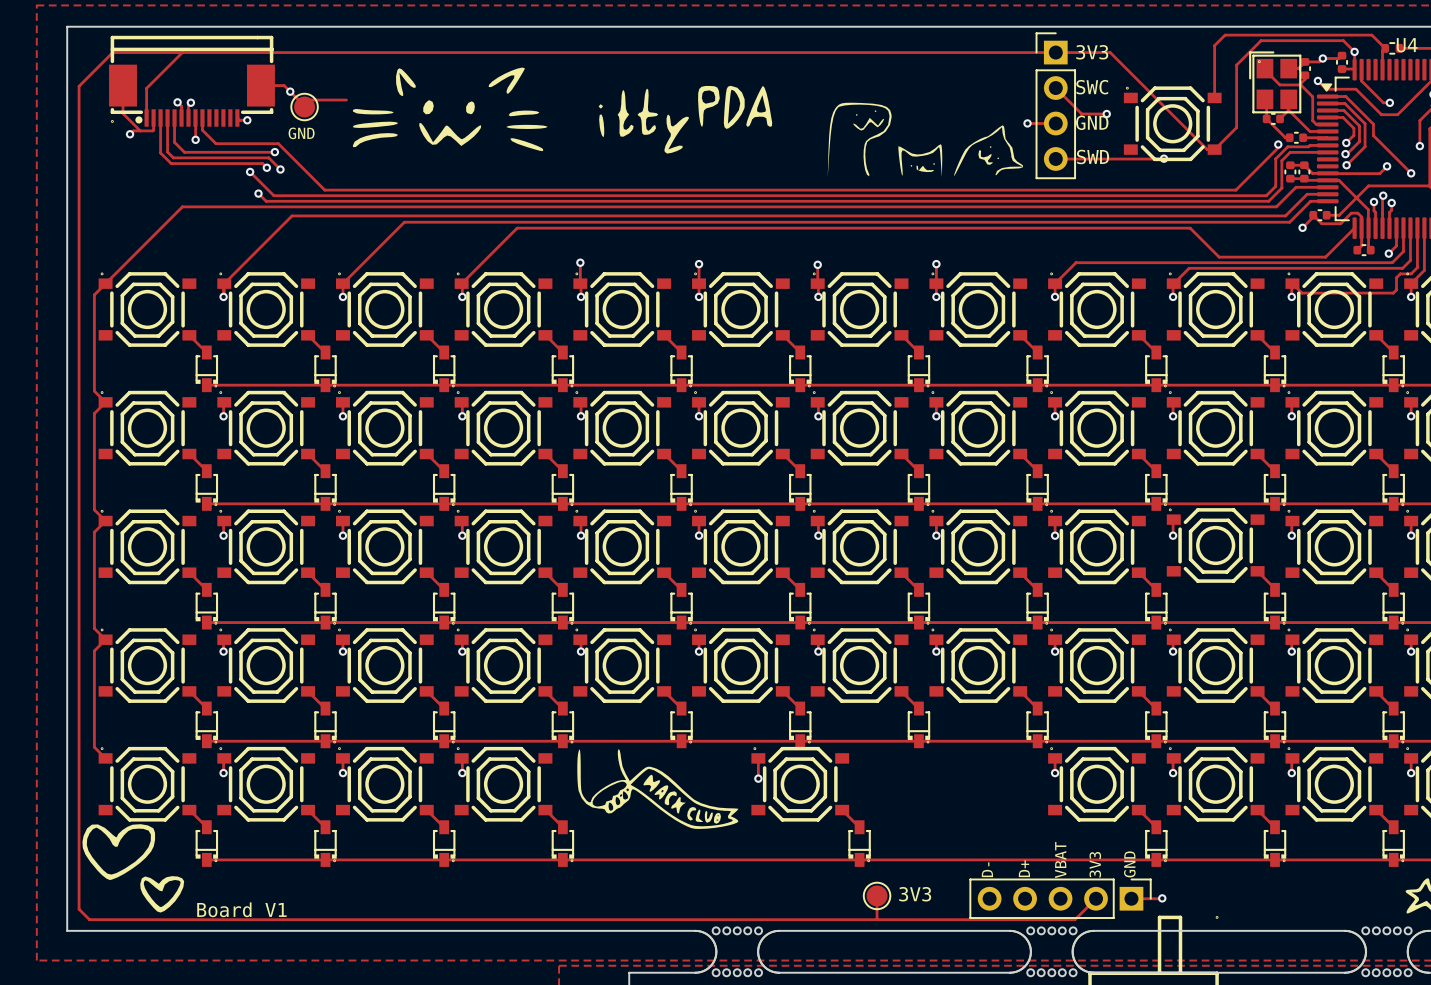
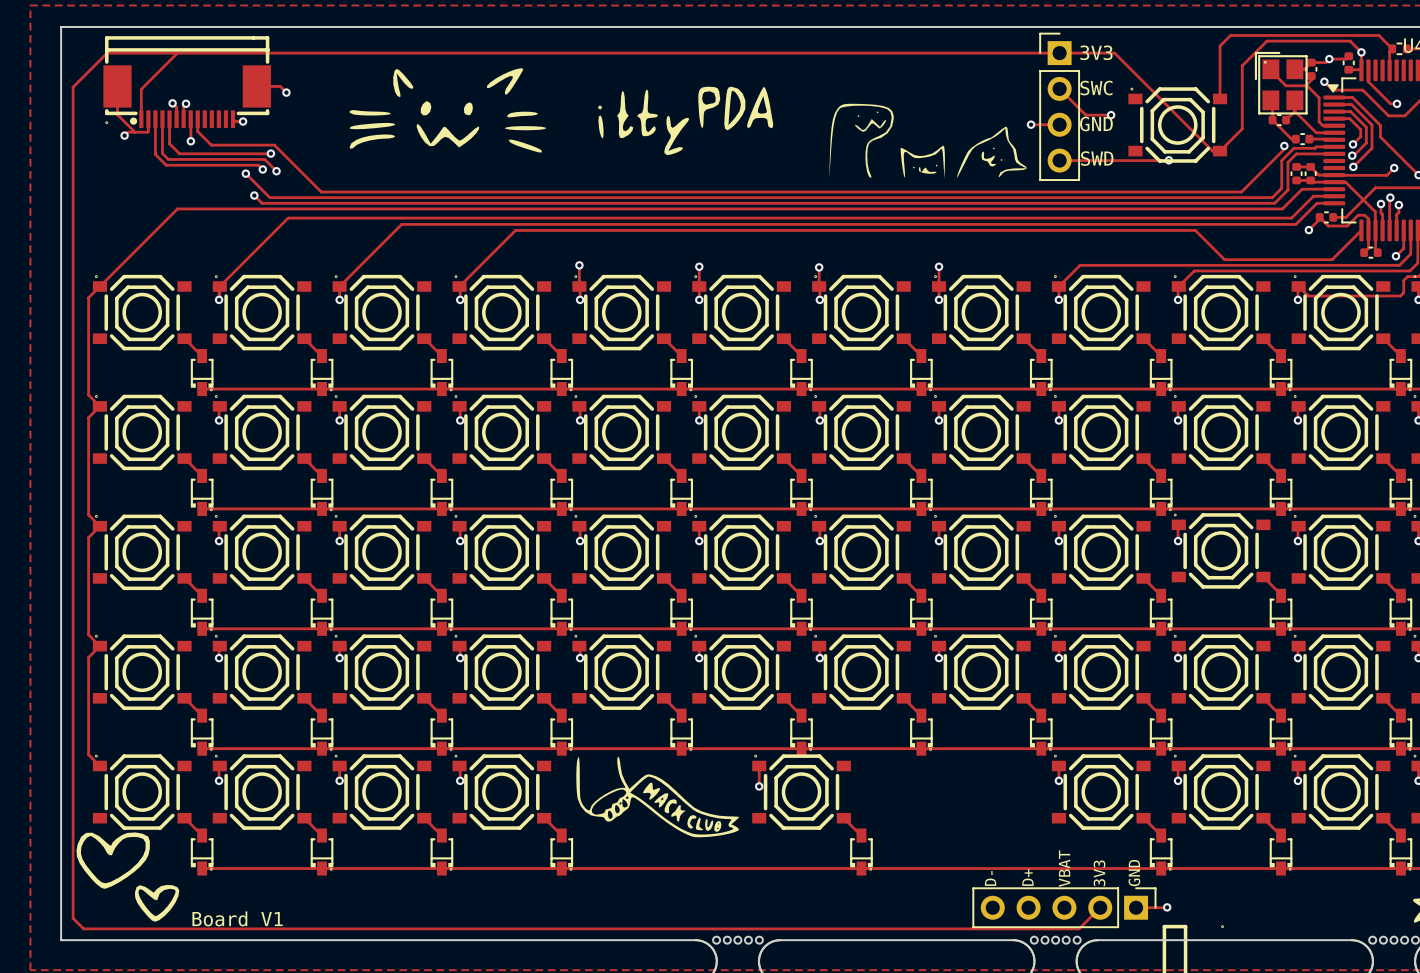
track: (290, 91) (298, 100) (346, 100) -> none
part: (304, 107) -> none
text: GND (301, 133) -> none
text: 3V3 (915, 894) -> none
track: (877, 895) (877, 919) -> none
part: (877, 895) -> none

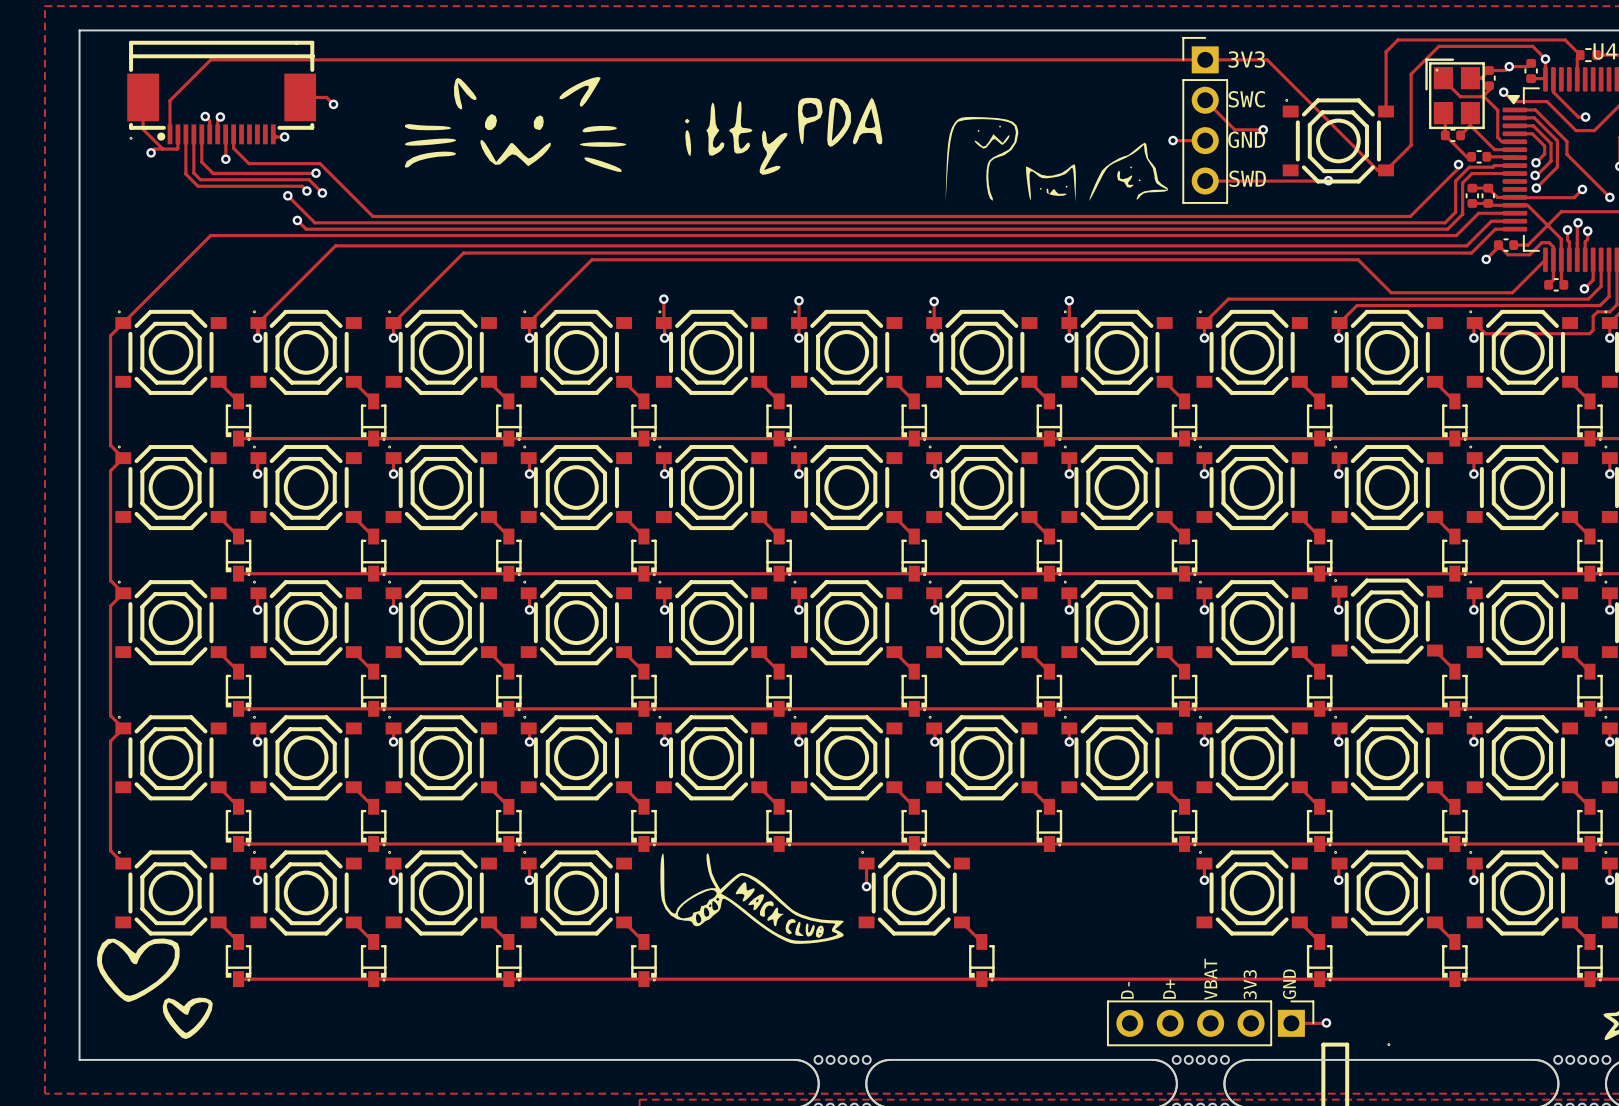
track: (177, 53) (107, 53) (73, 87) (73, 918) (83, 928) (1079, 928) (1100, 907) -> none
text: Board V1 (237, 918) -> none

